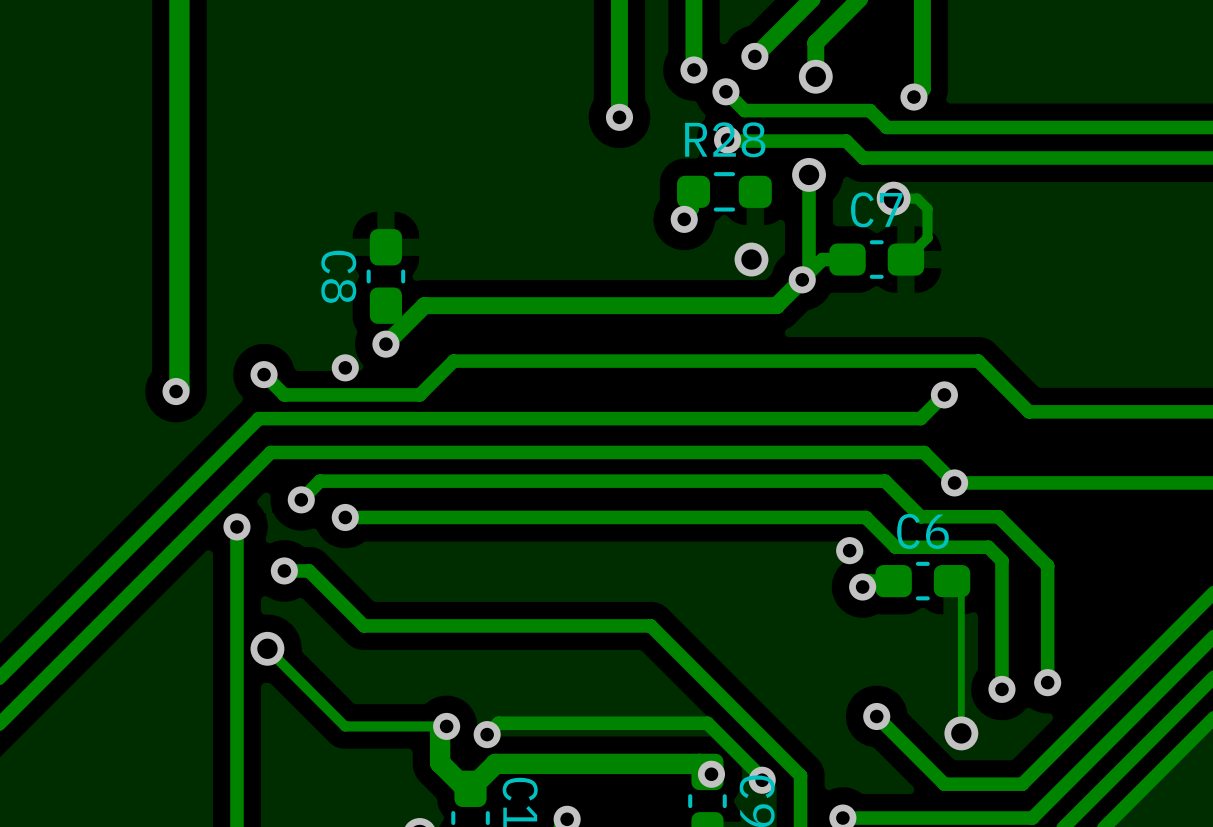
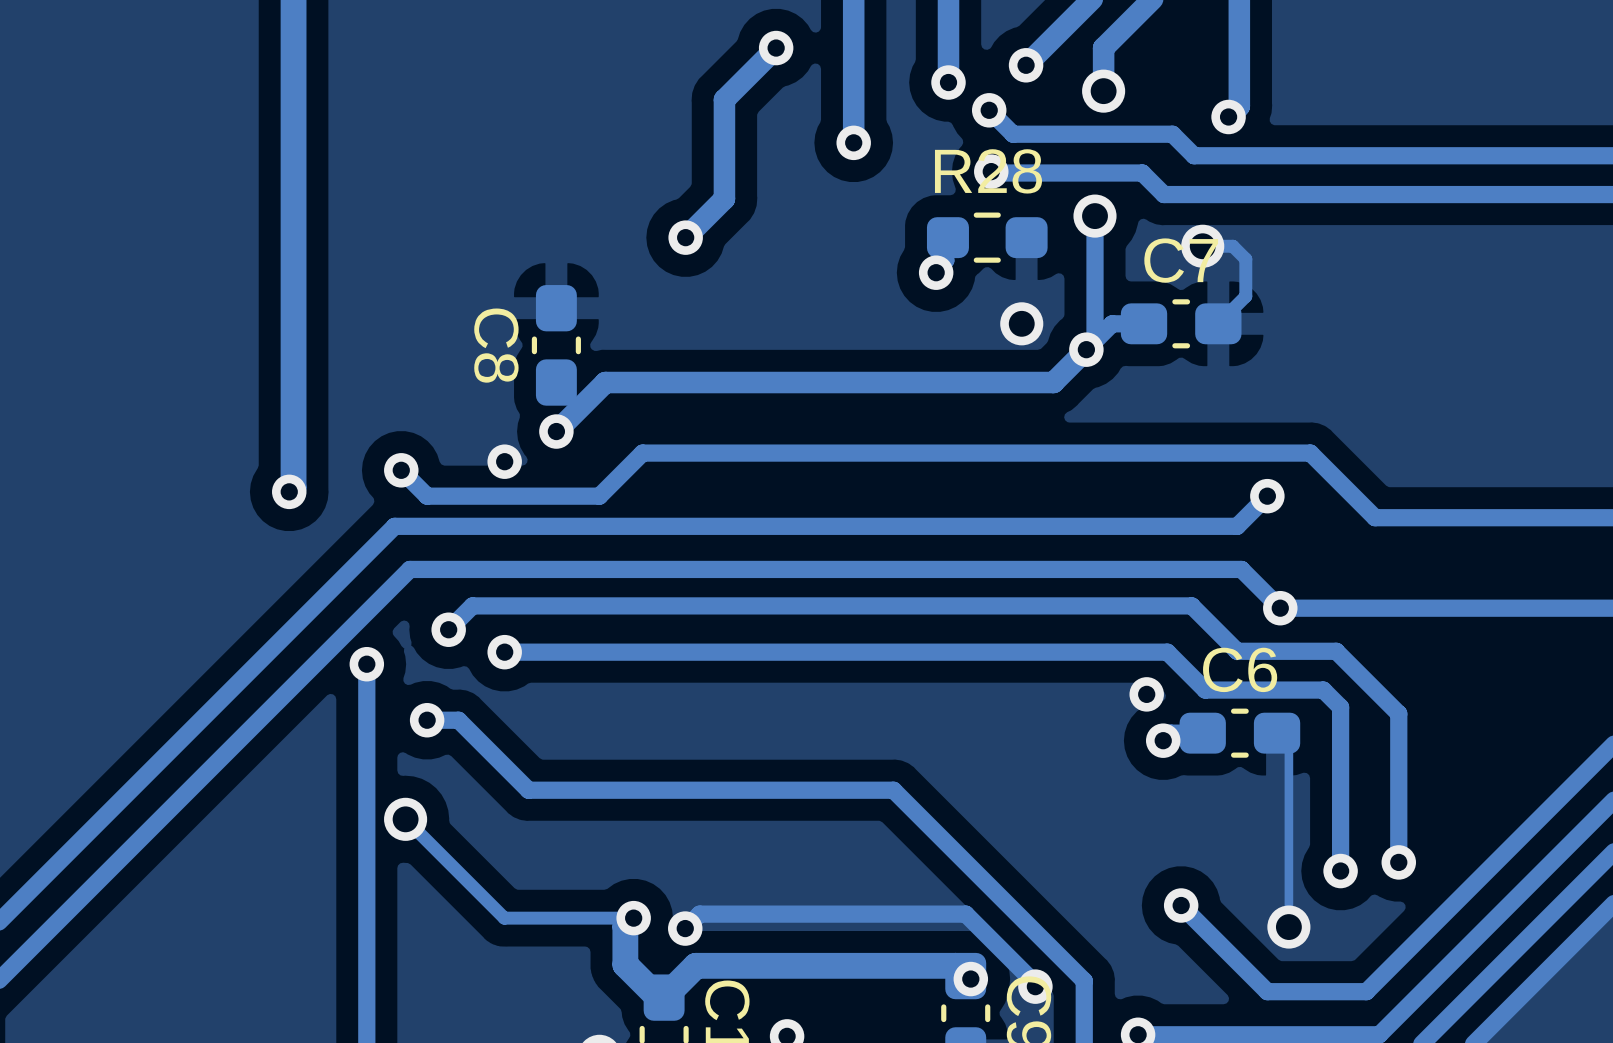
track: none -> (776, 48) (724, 99) (724, 198) (685, 237)
via: none -> (776, 48)
via: none -> (685, 237)

